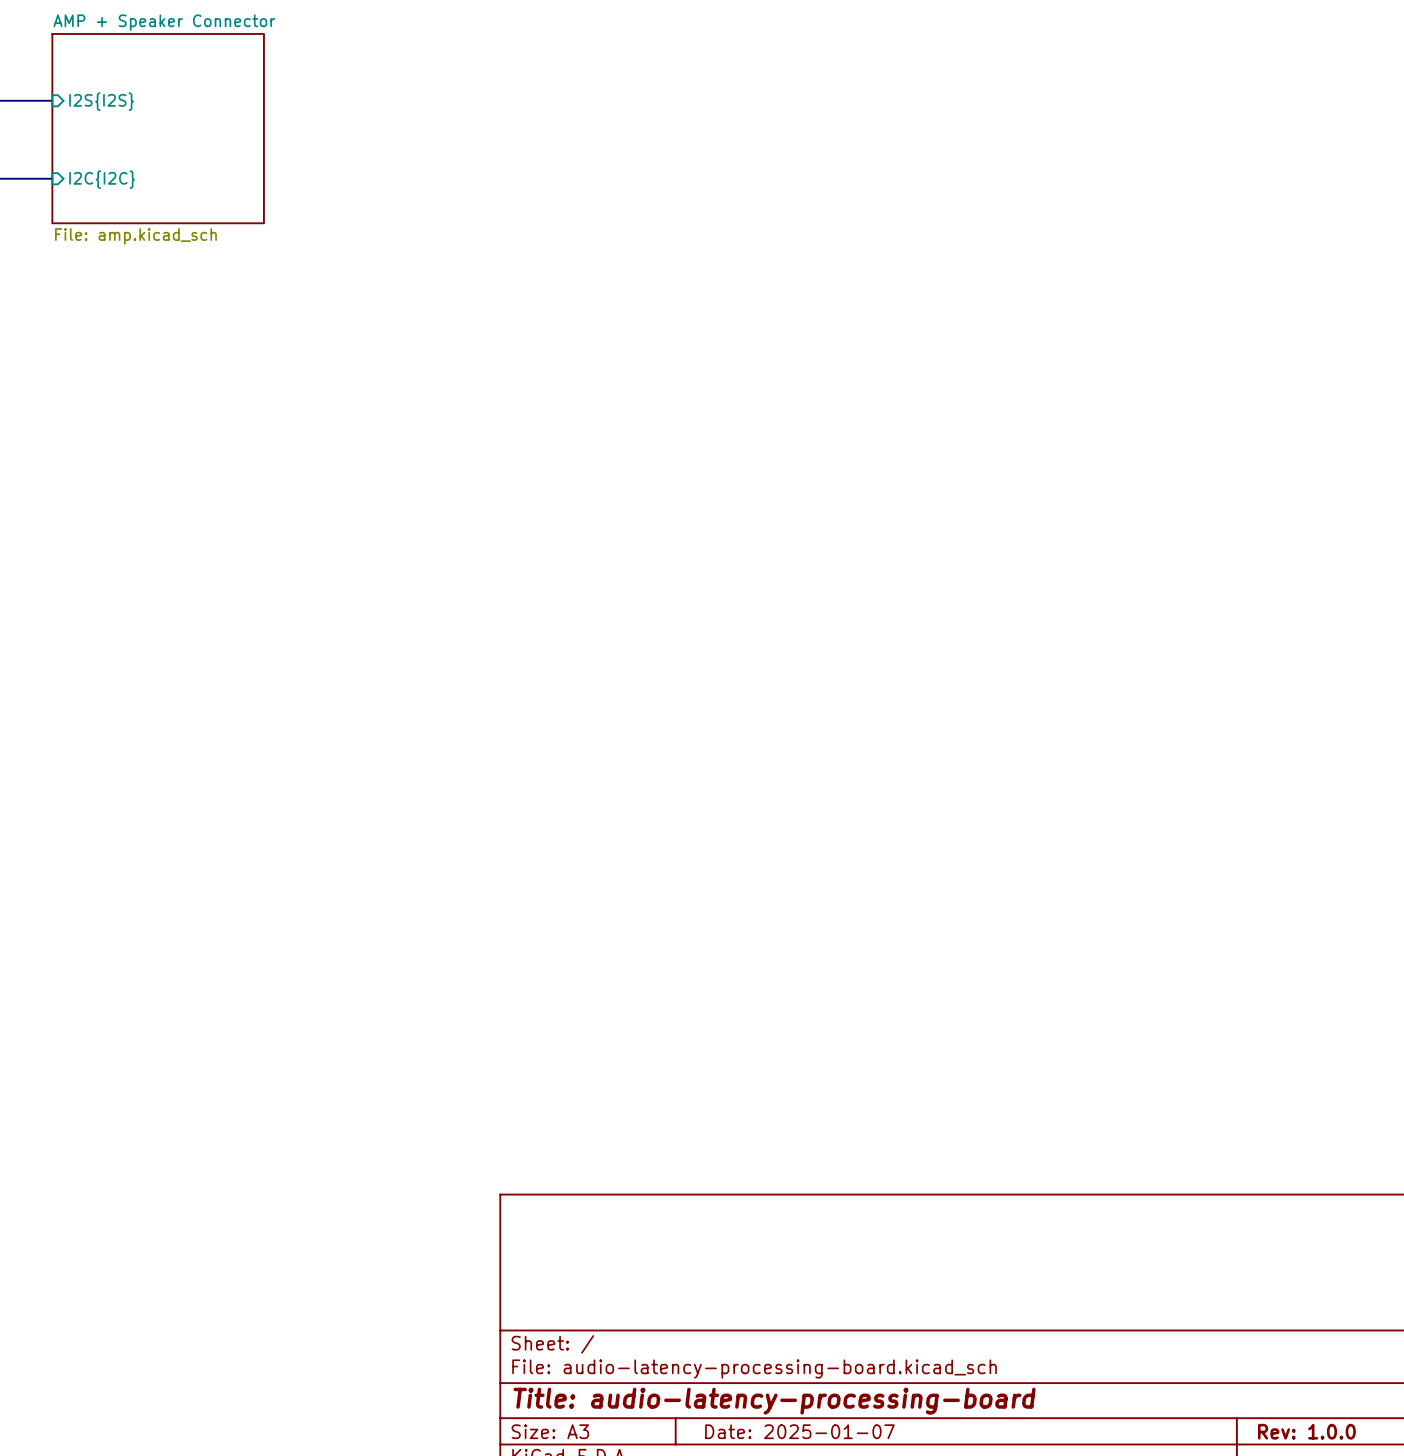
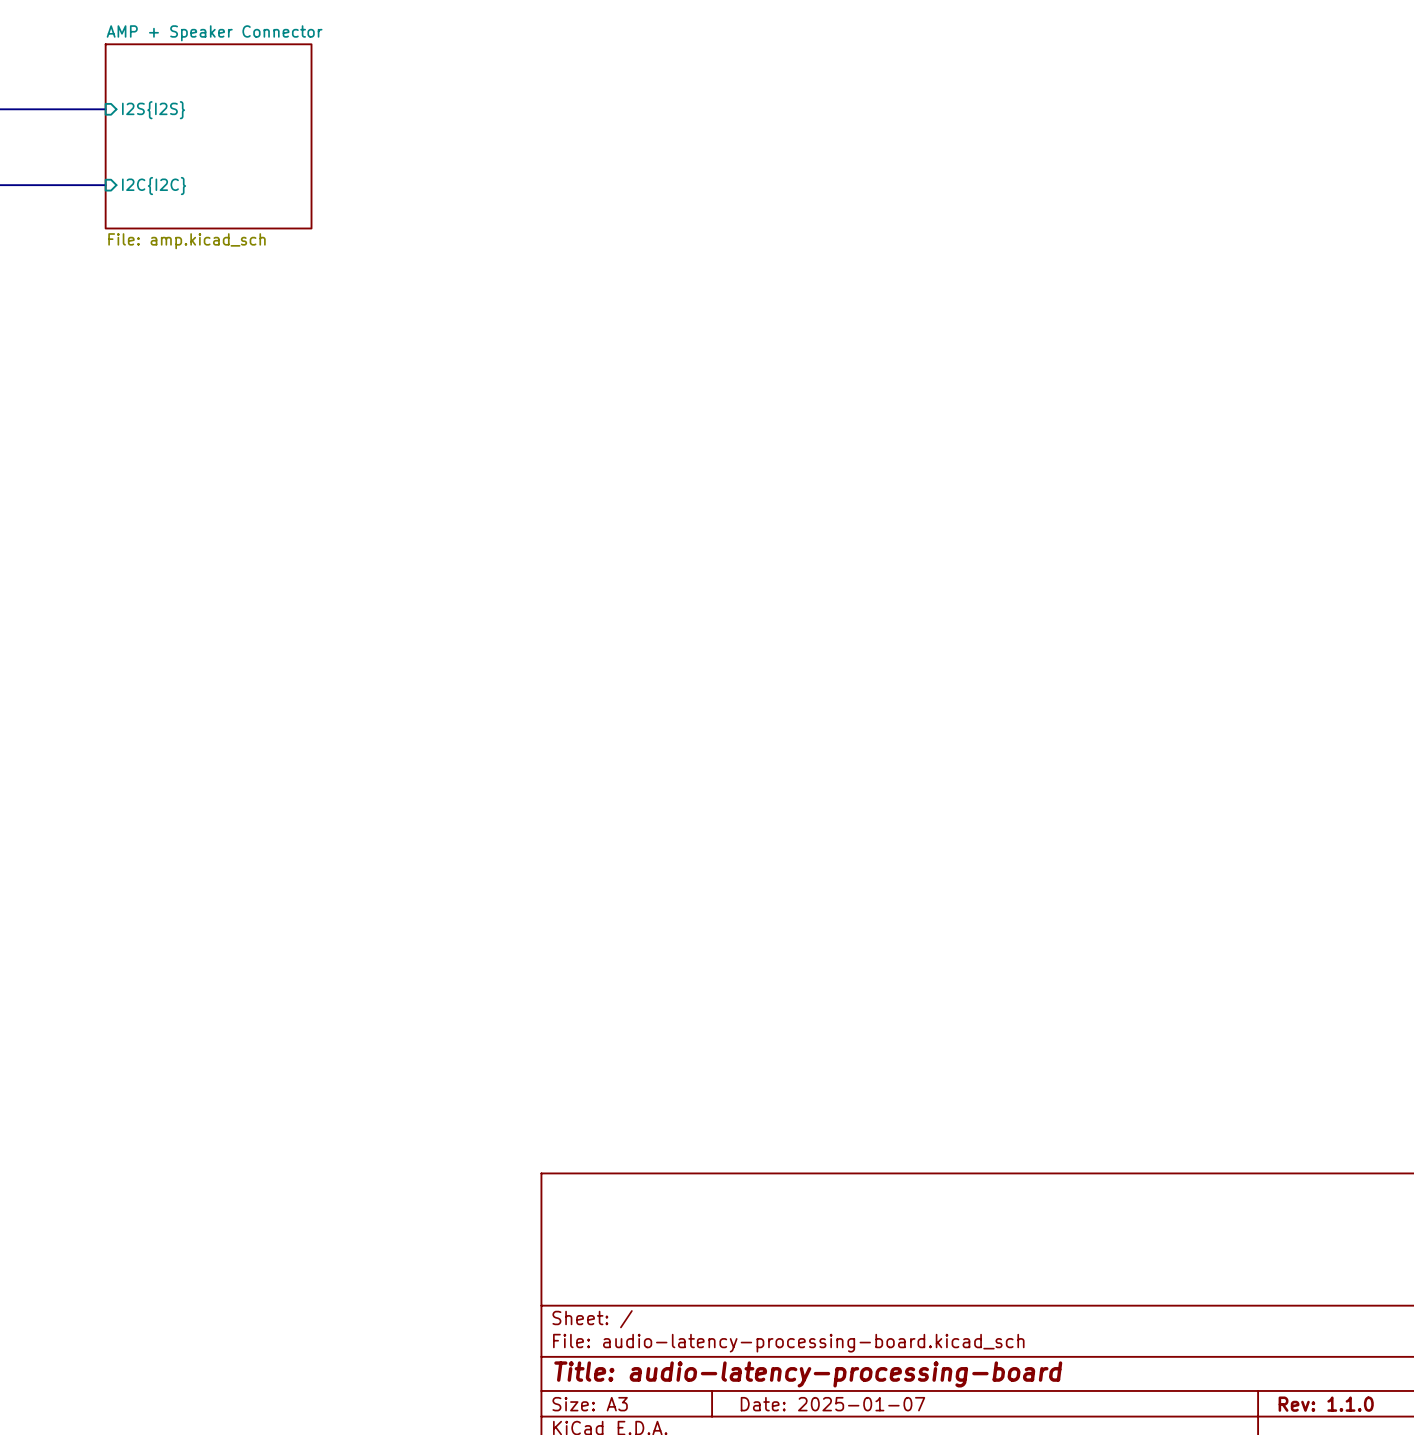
title block: Rev: 1.0.0 (1306, 1431) -> Rev: 1.1.0 (1326, 1404)

